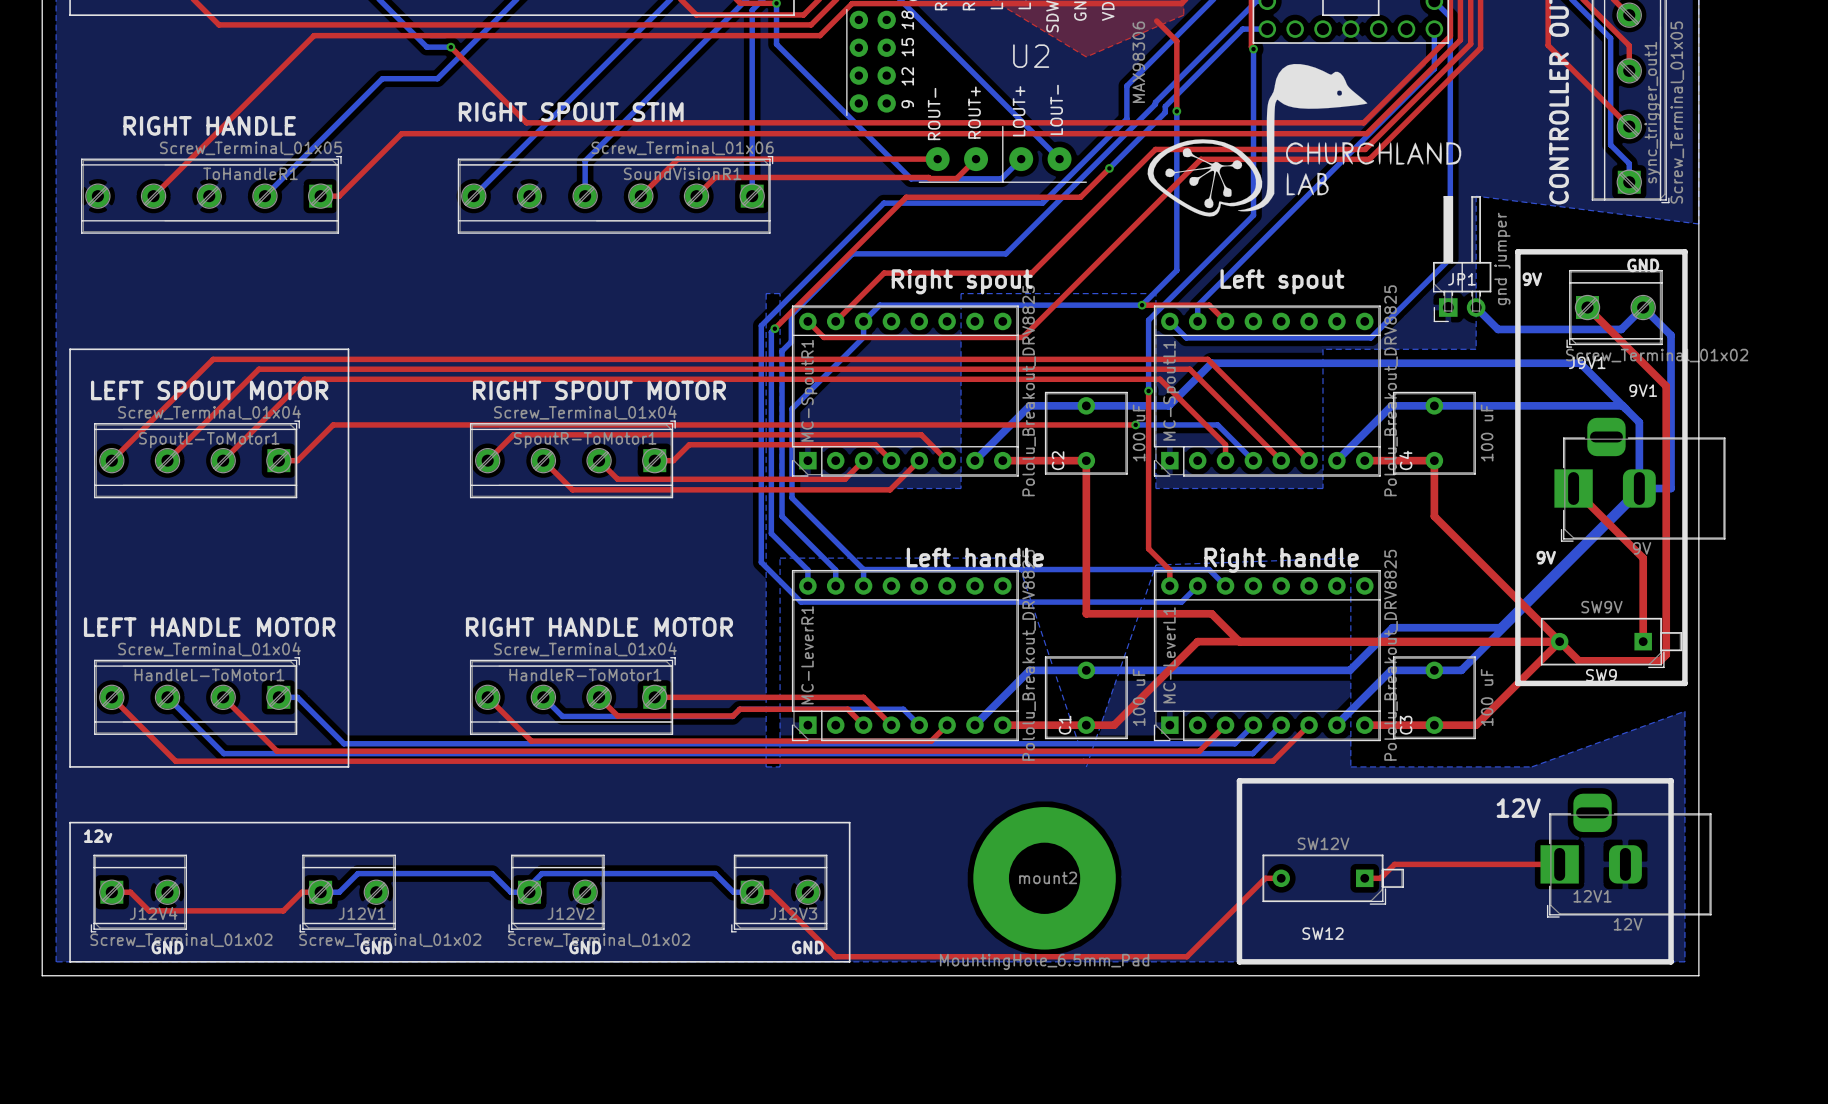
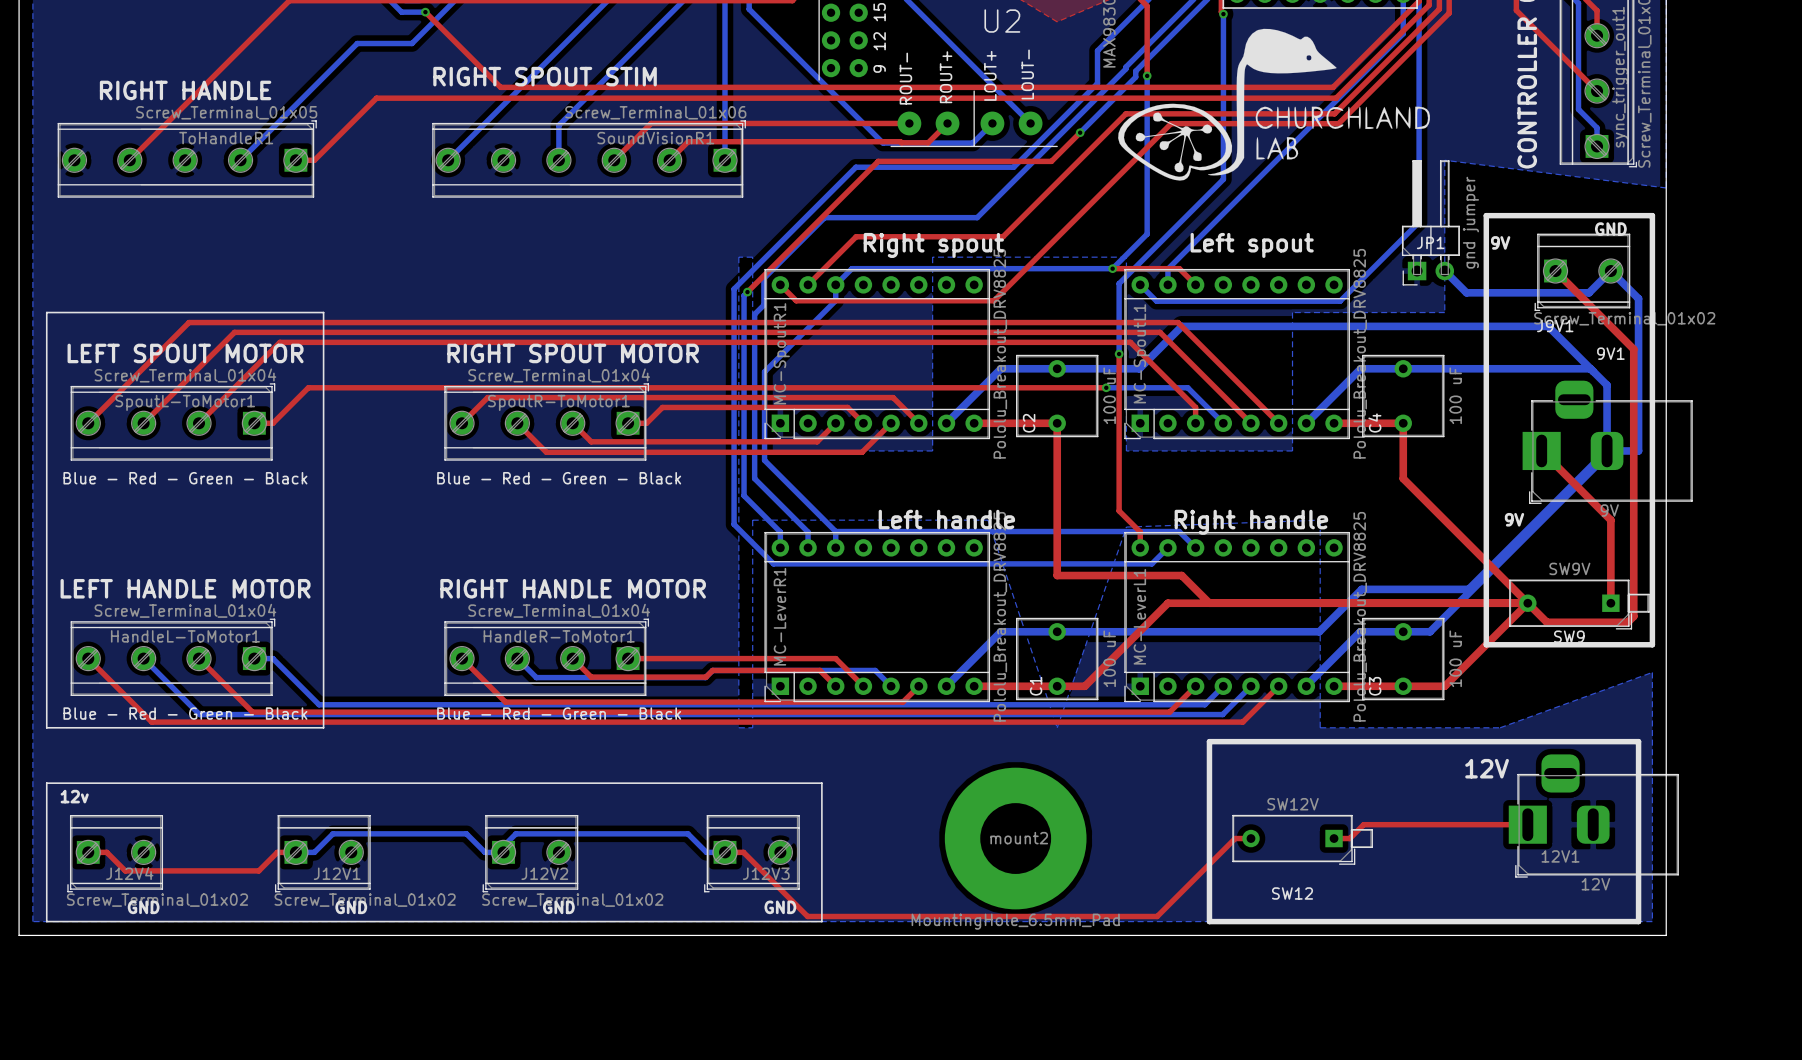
text: none -> Blue - Red - Green - Black (185, 478)
text: none -> Blue - Red - Green - Black (559, 478)
text: none -> Blue - Red - Green - Black (185, 713)
text: none -> Blue - Red - Green - Black (559, 713)

